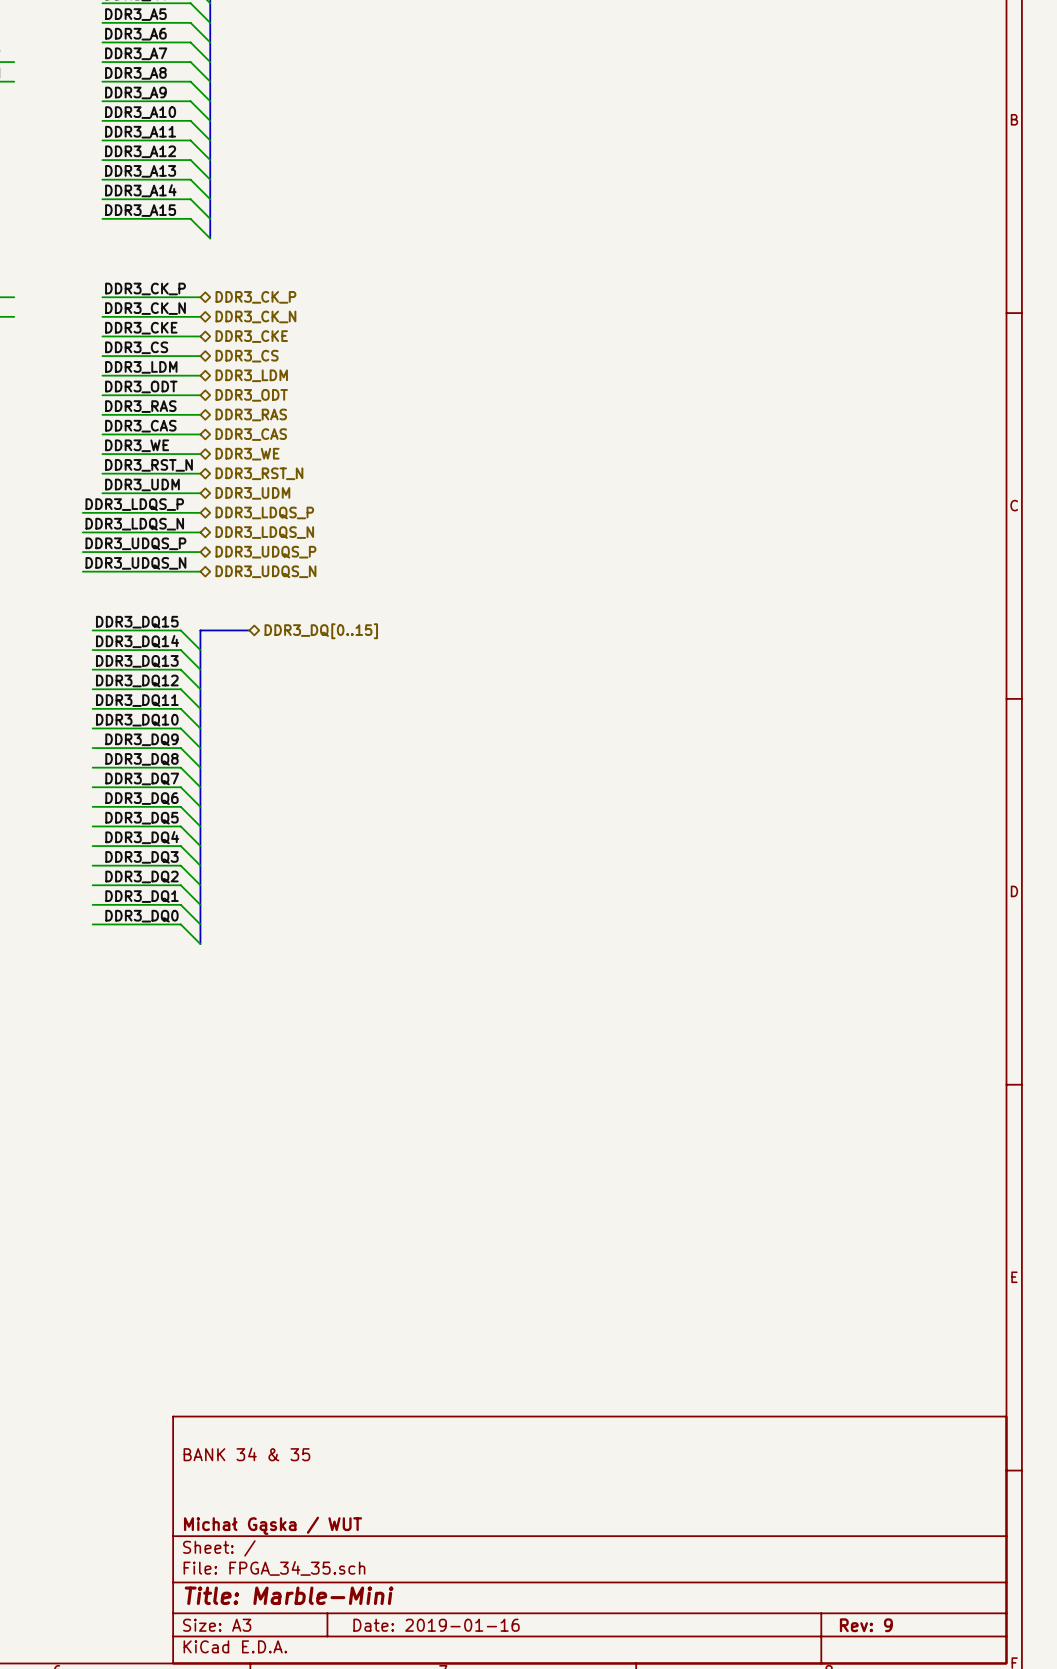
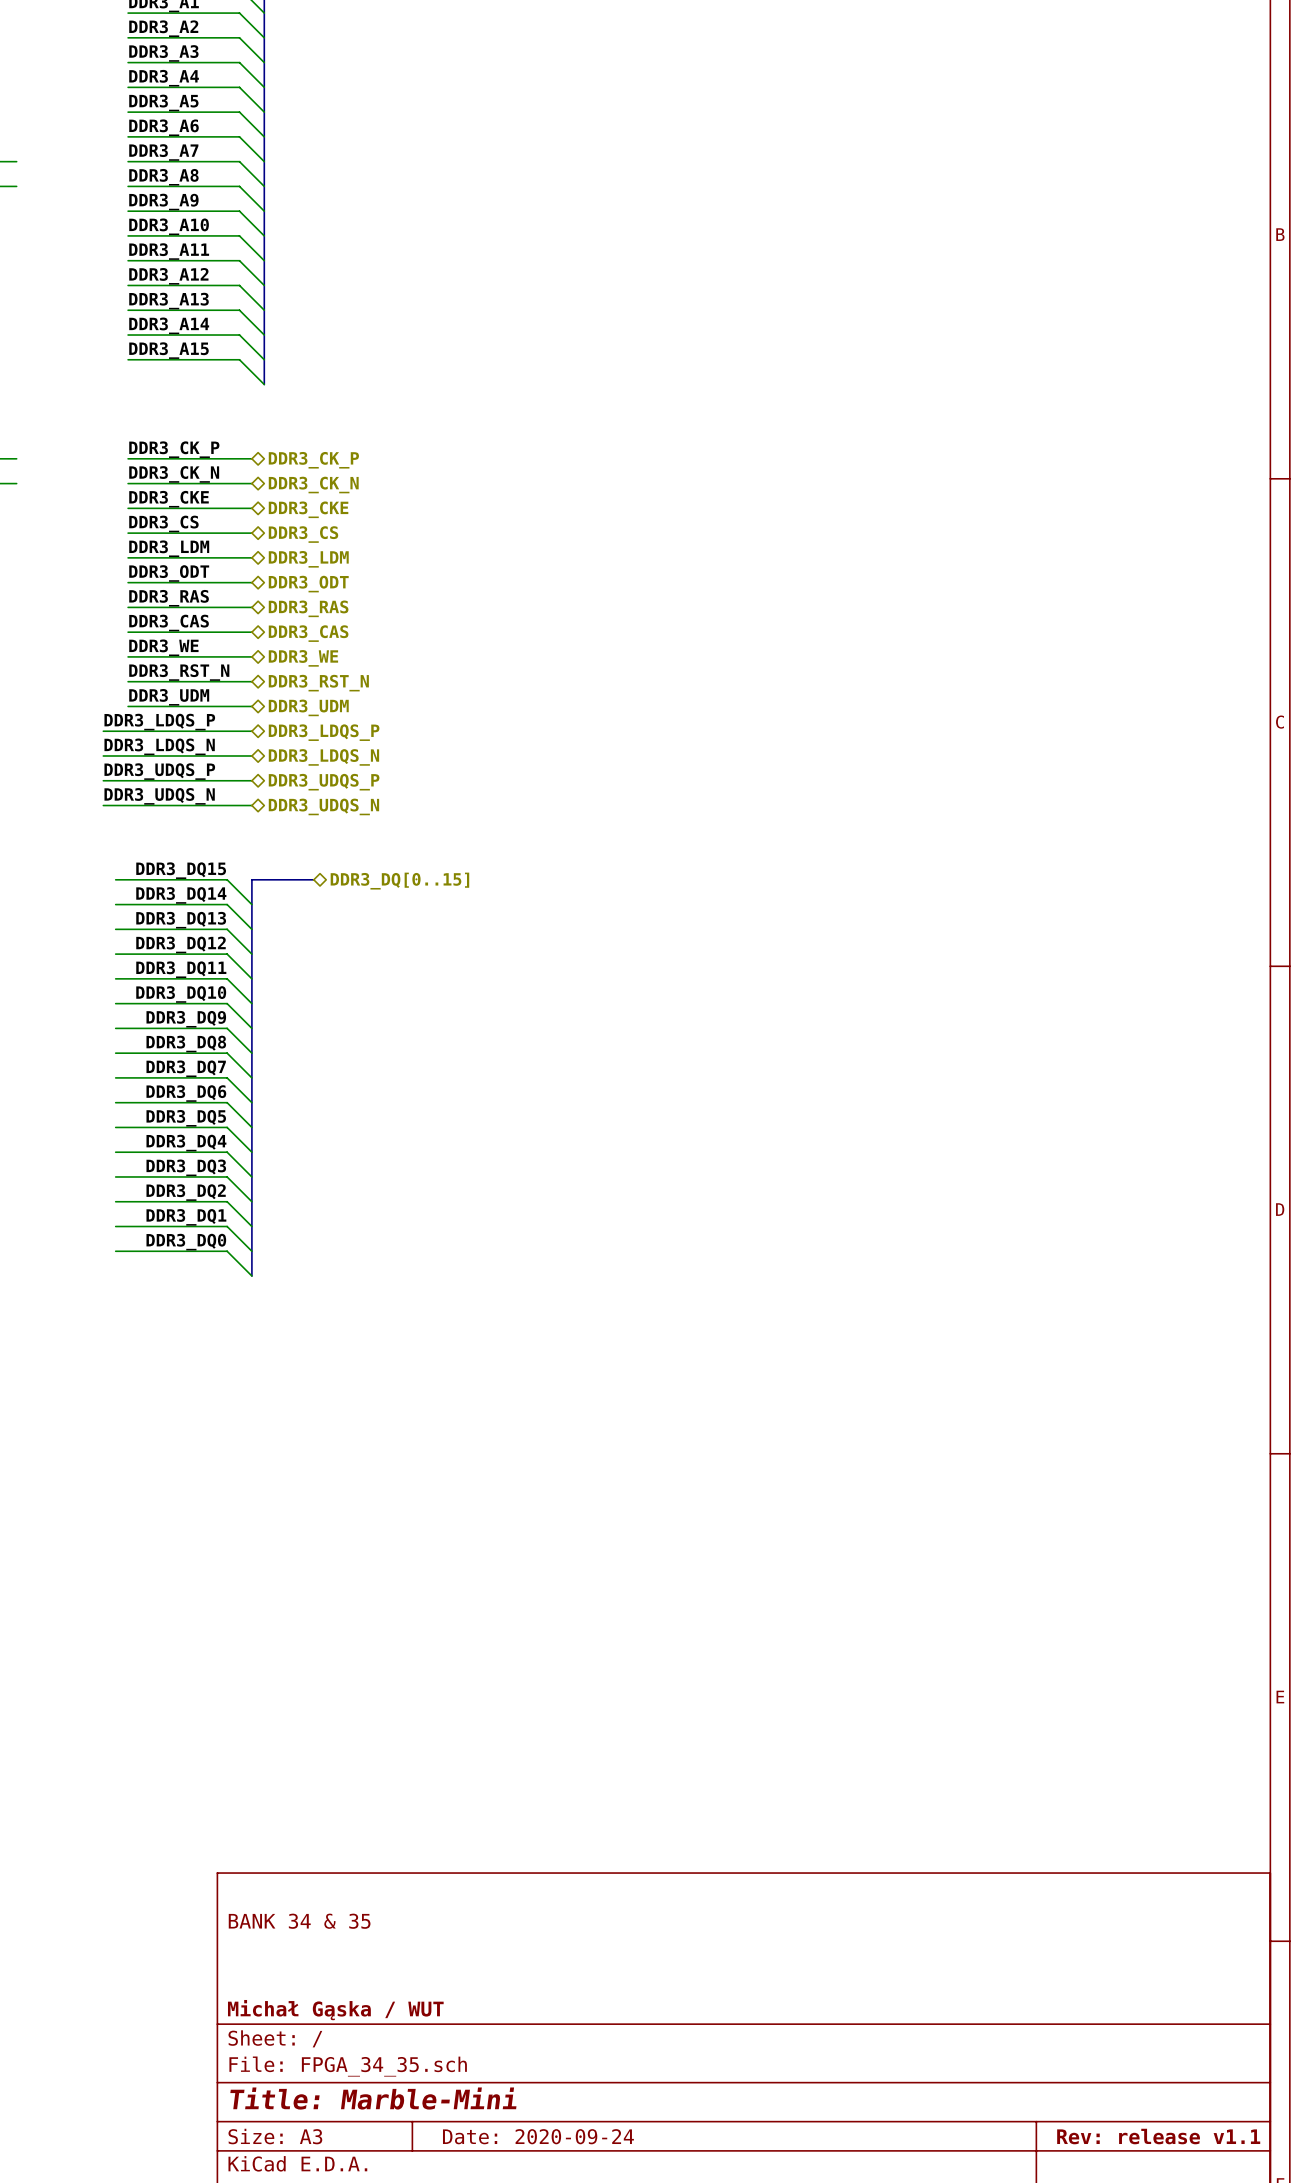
title block: Date: 2019-01-16 (436, 1625) -> Date: 2020-09-24 (538, 2136)
title block: Rev: 9 (866, 1625) -> Rev: release v1.1 (1158, 2136)

